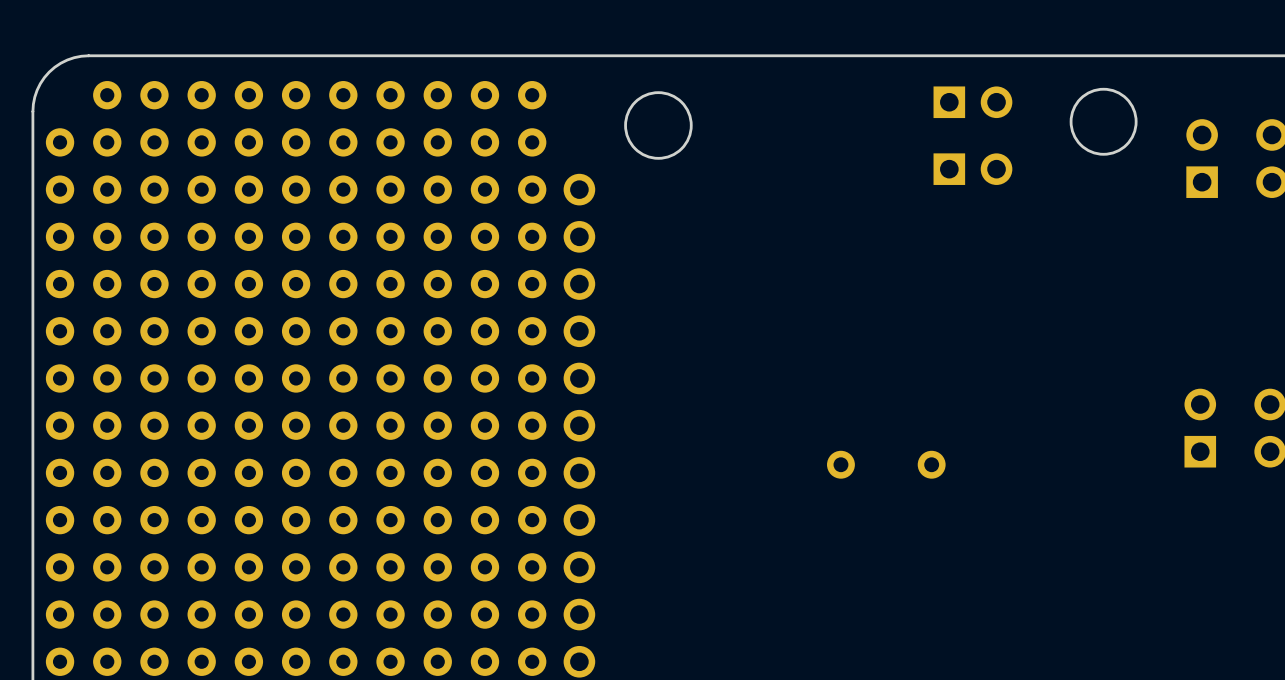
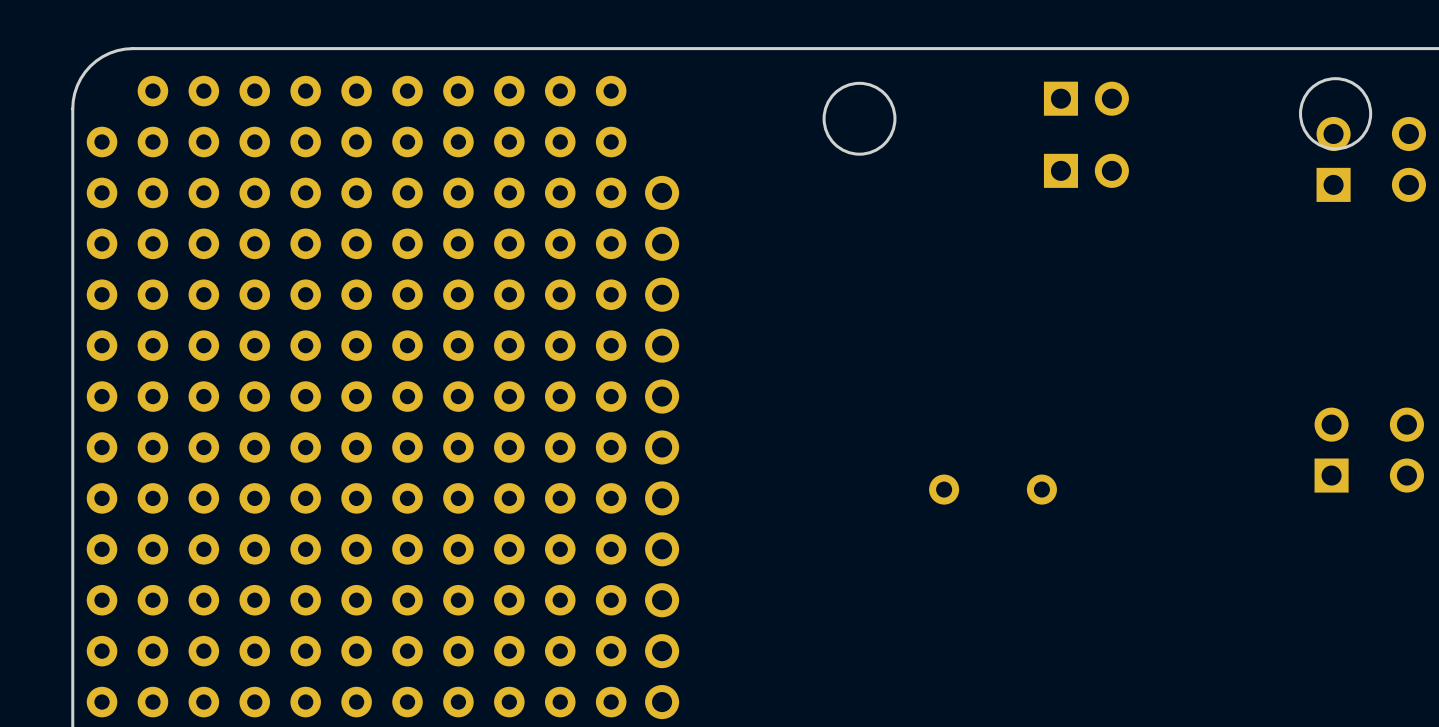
round board edge position: (1103, 121) -> (1335, 113)
round board edge position: (658, 125) -> (859, 118)

